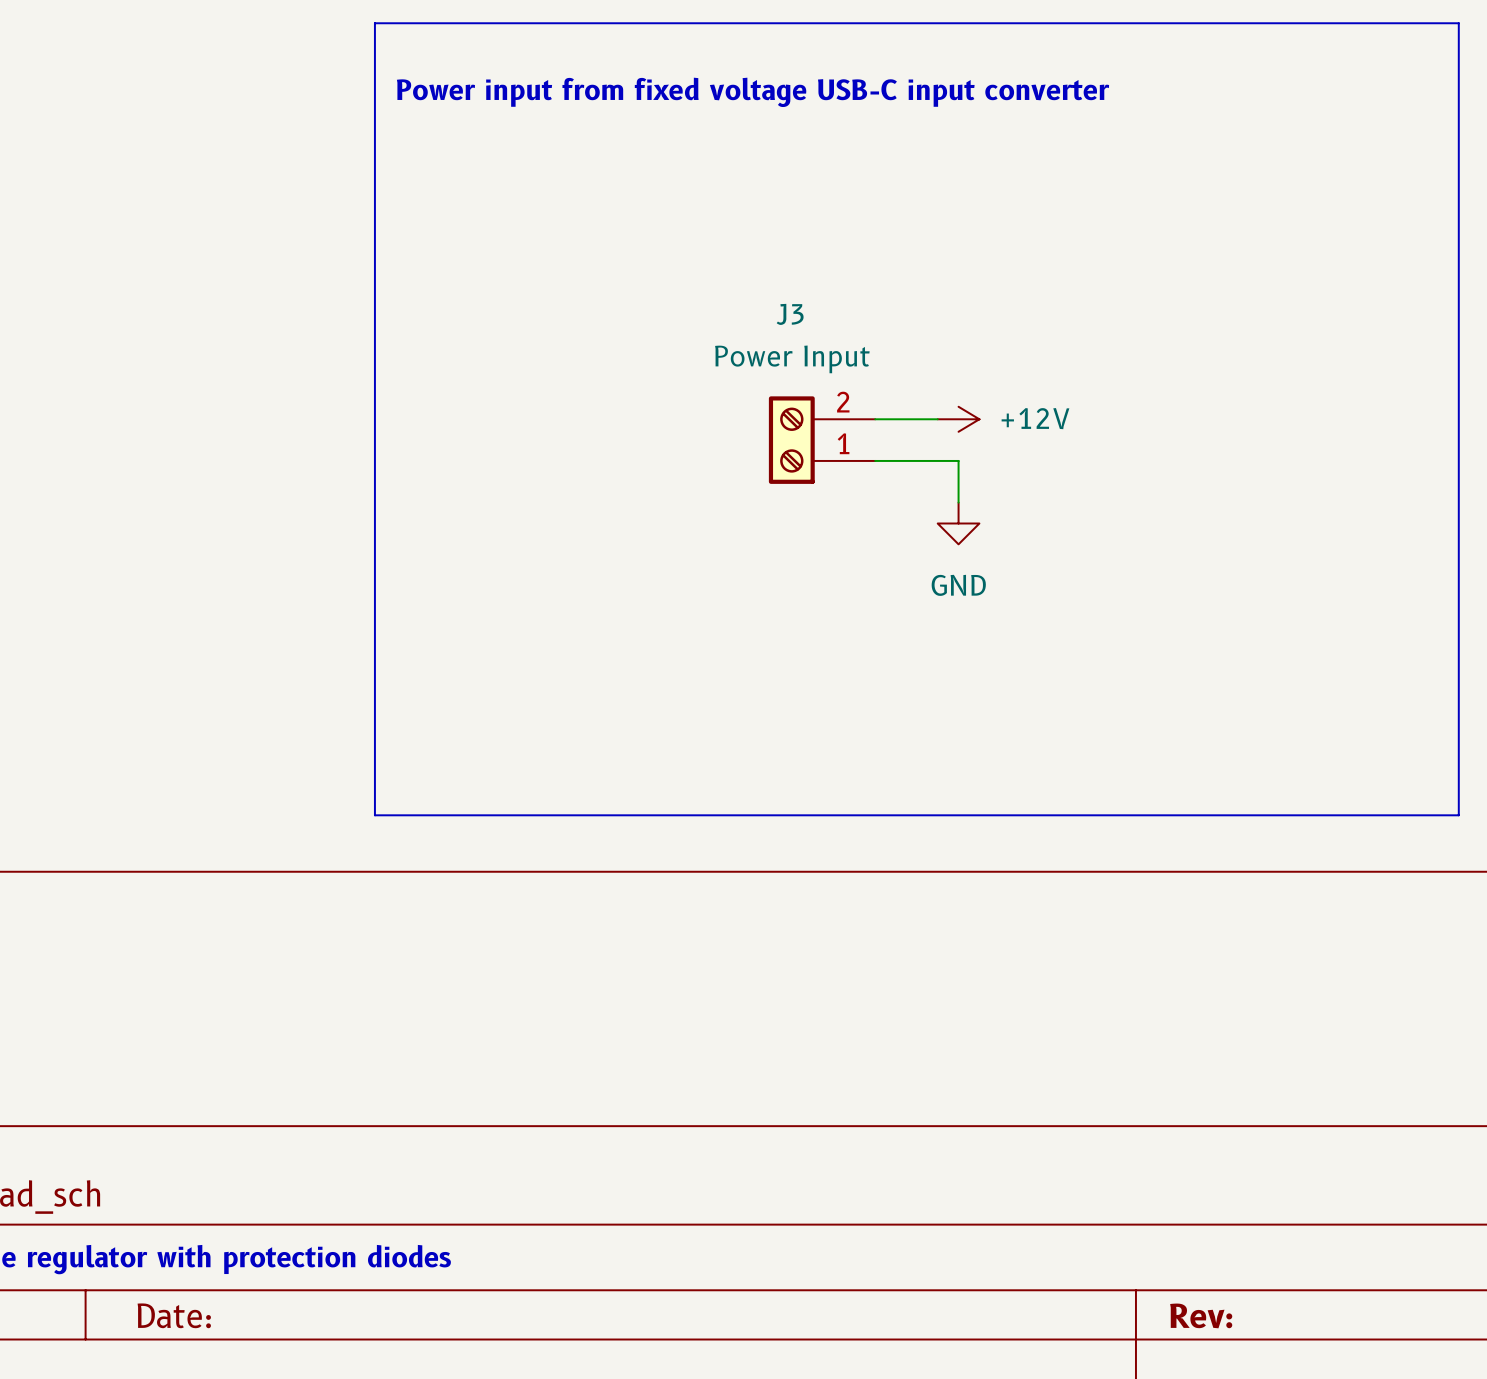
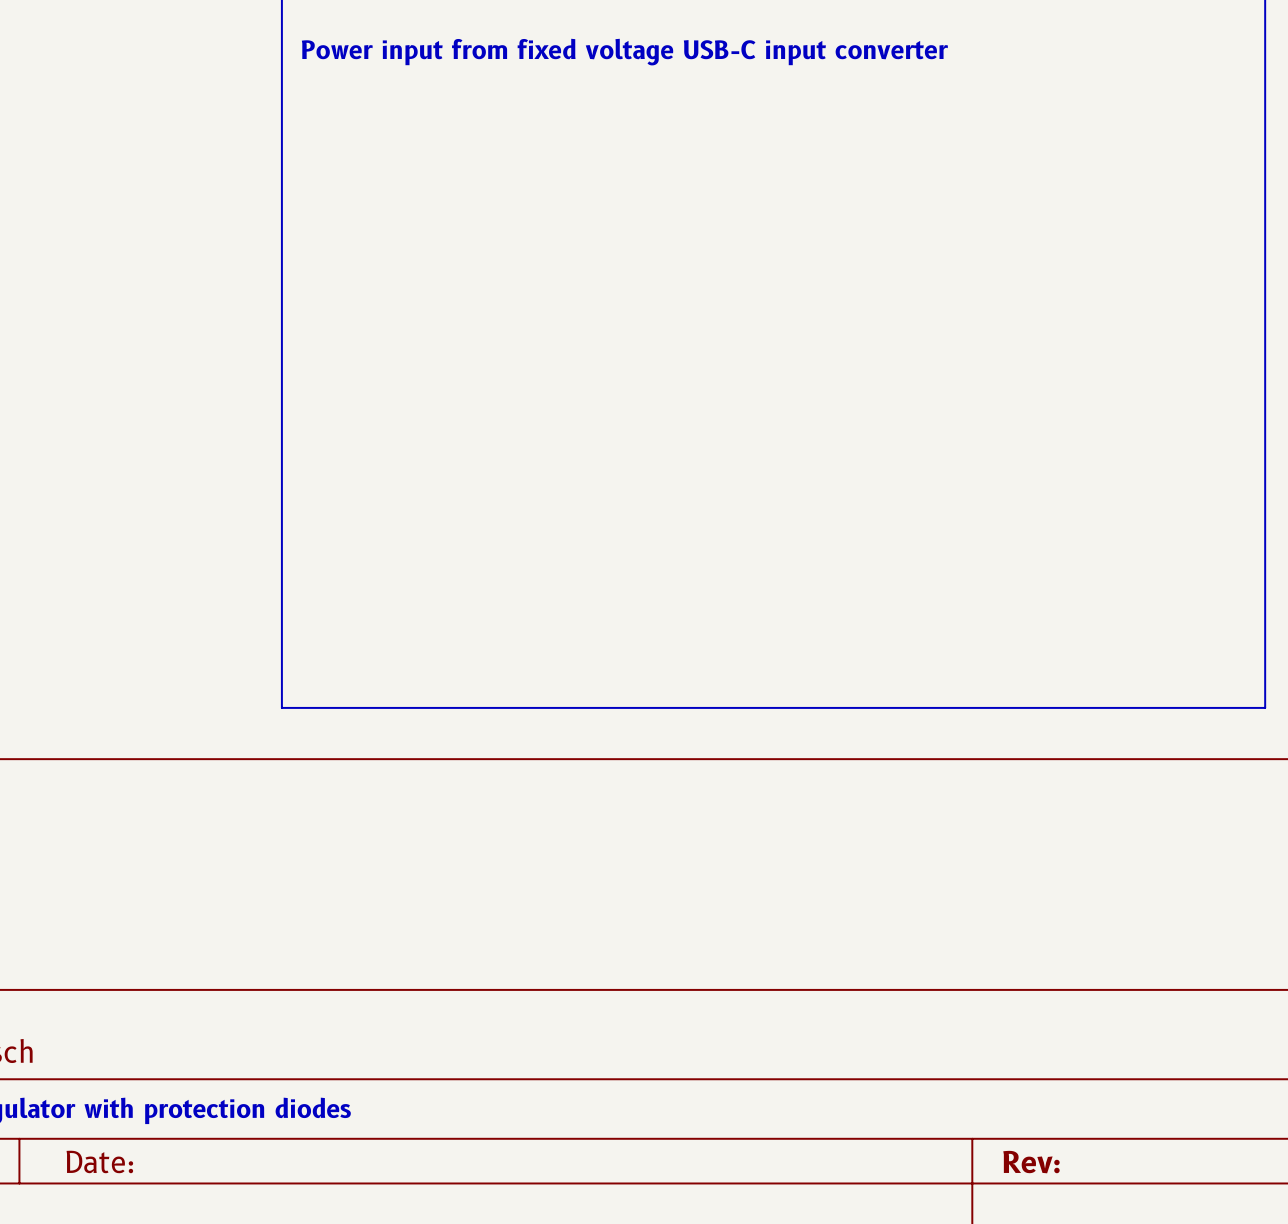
wire: (875, 419) (937, 419) -> none
power symbol: +12V (958, 419) -> none
J3: Power Input (822, 440) -> none
wire: (875, 460) (958, 460) (958, 502) -> none
power symbol: GND (958, 523) -> none

